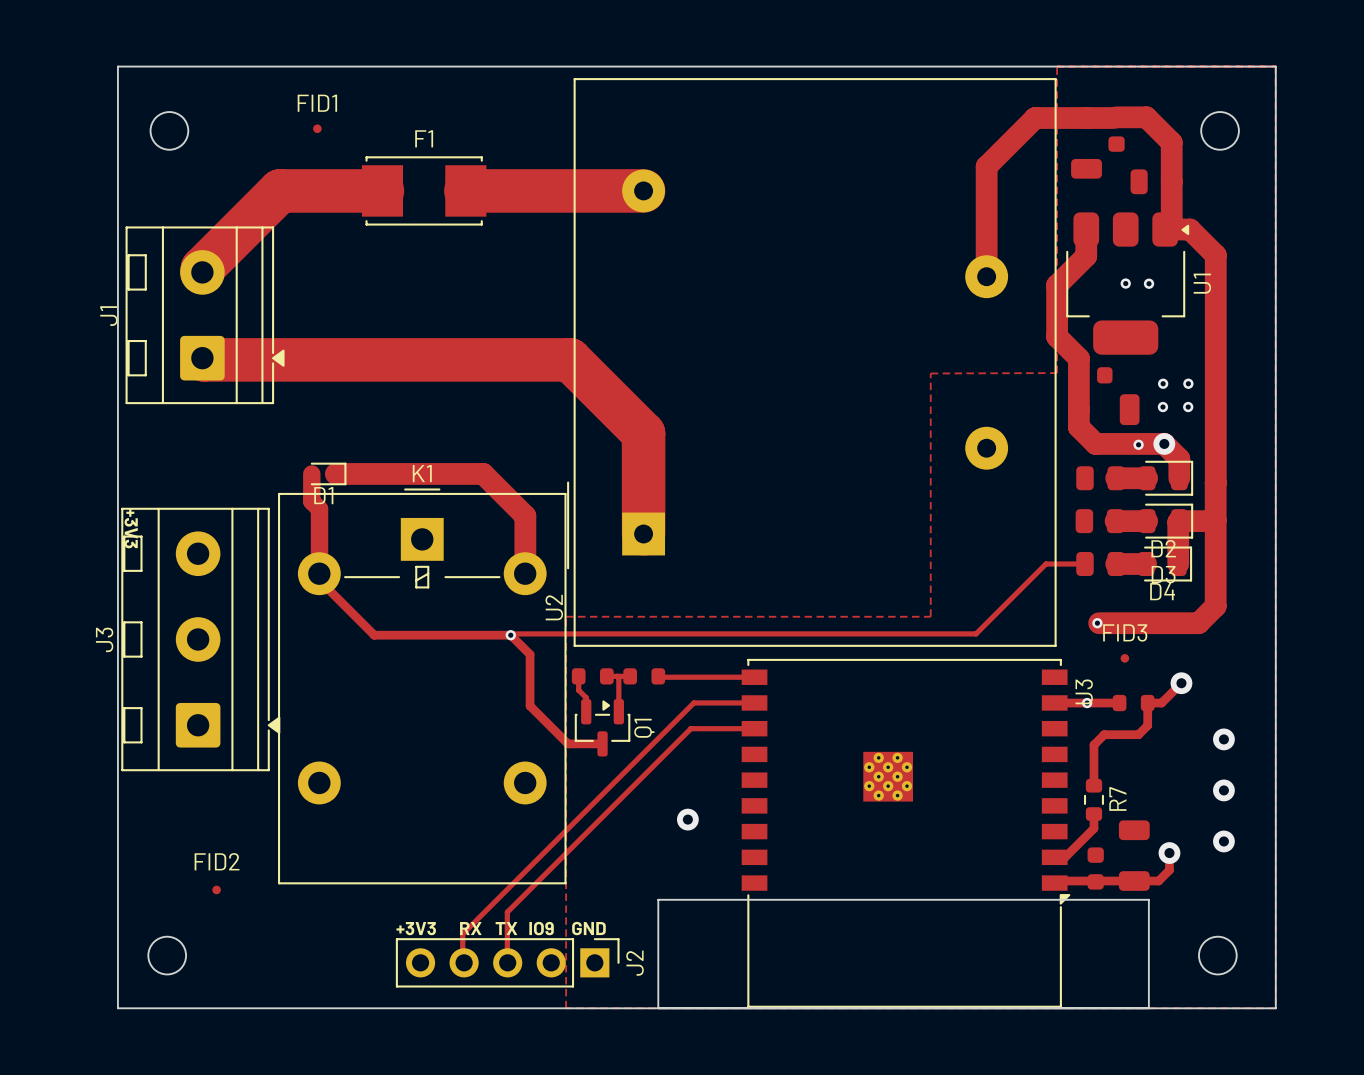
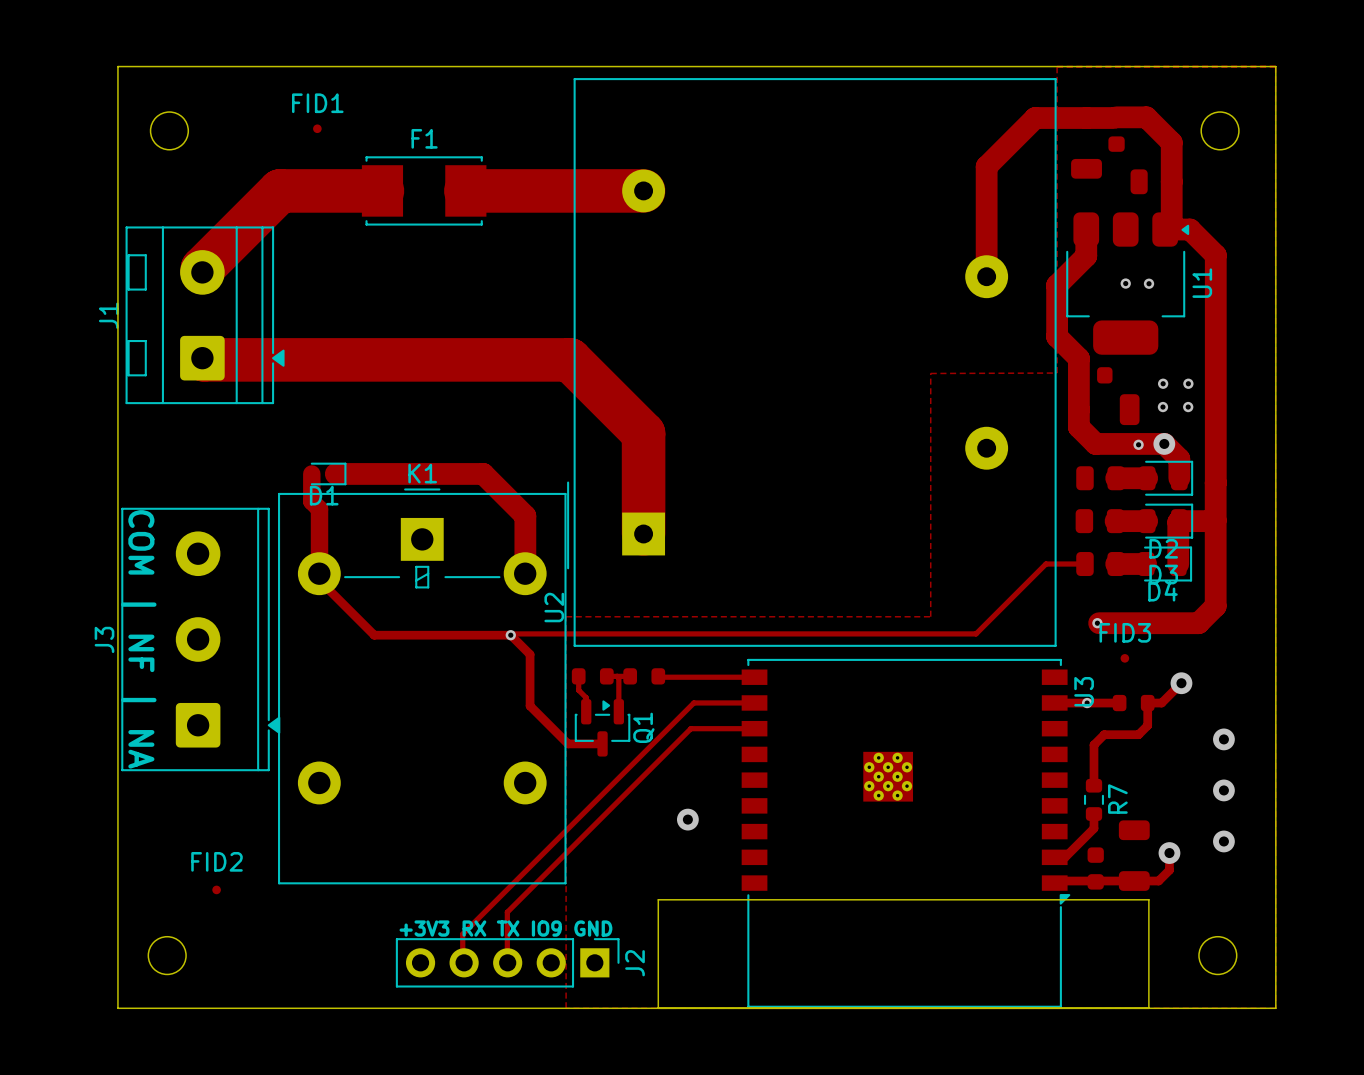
J3 footprint: [121, 507, 281, 772] -> [121, 507, 281, 772]
text: +3V3 (131, 528) -> COM | NF | NA (138, 639)

